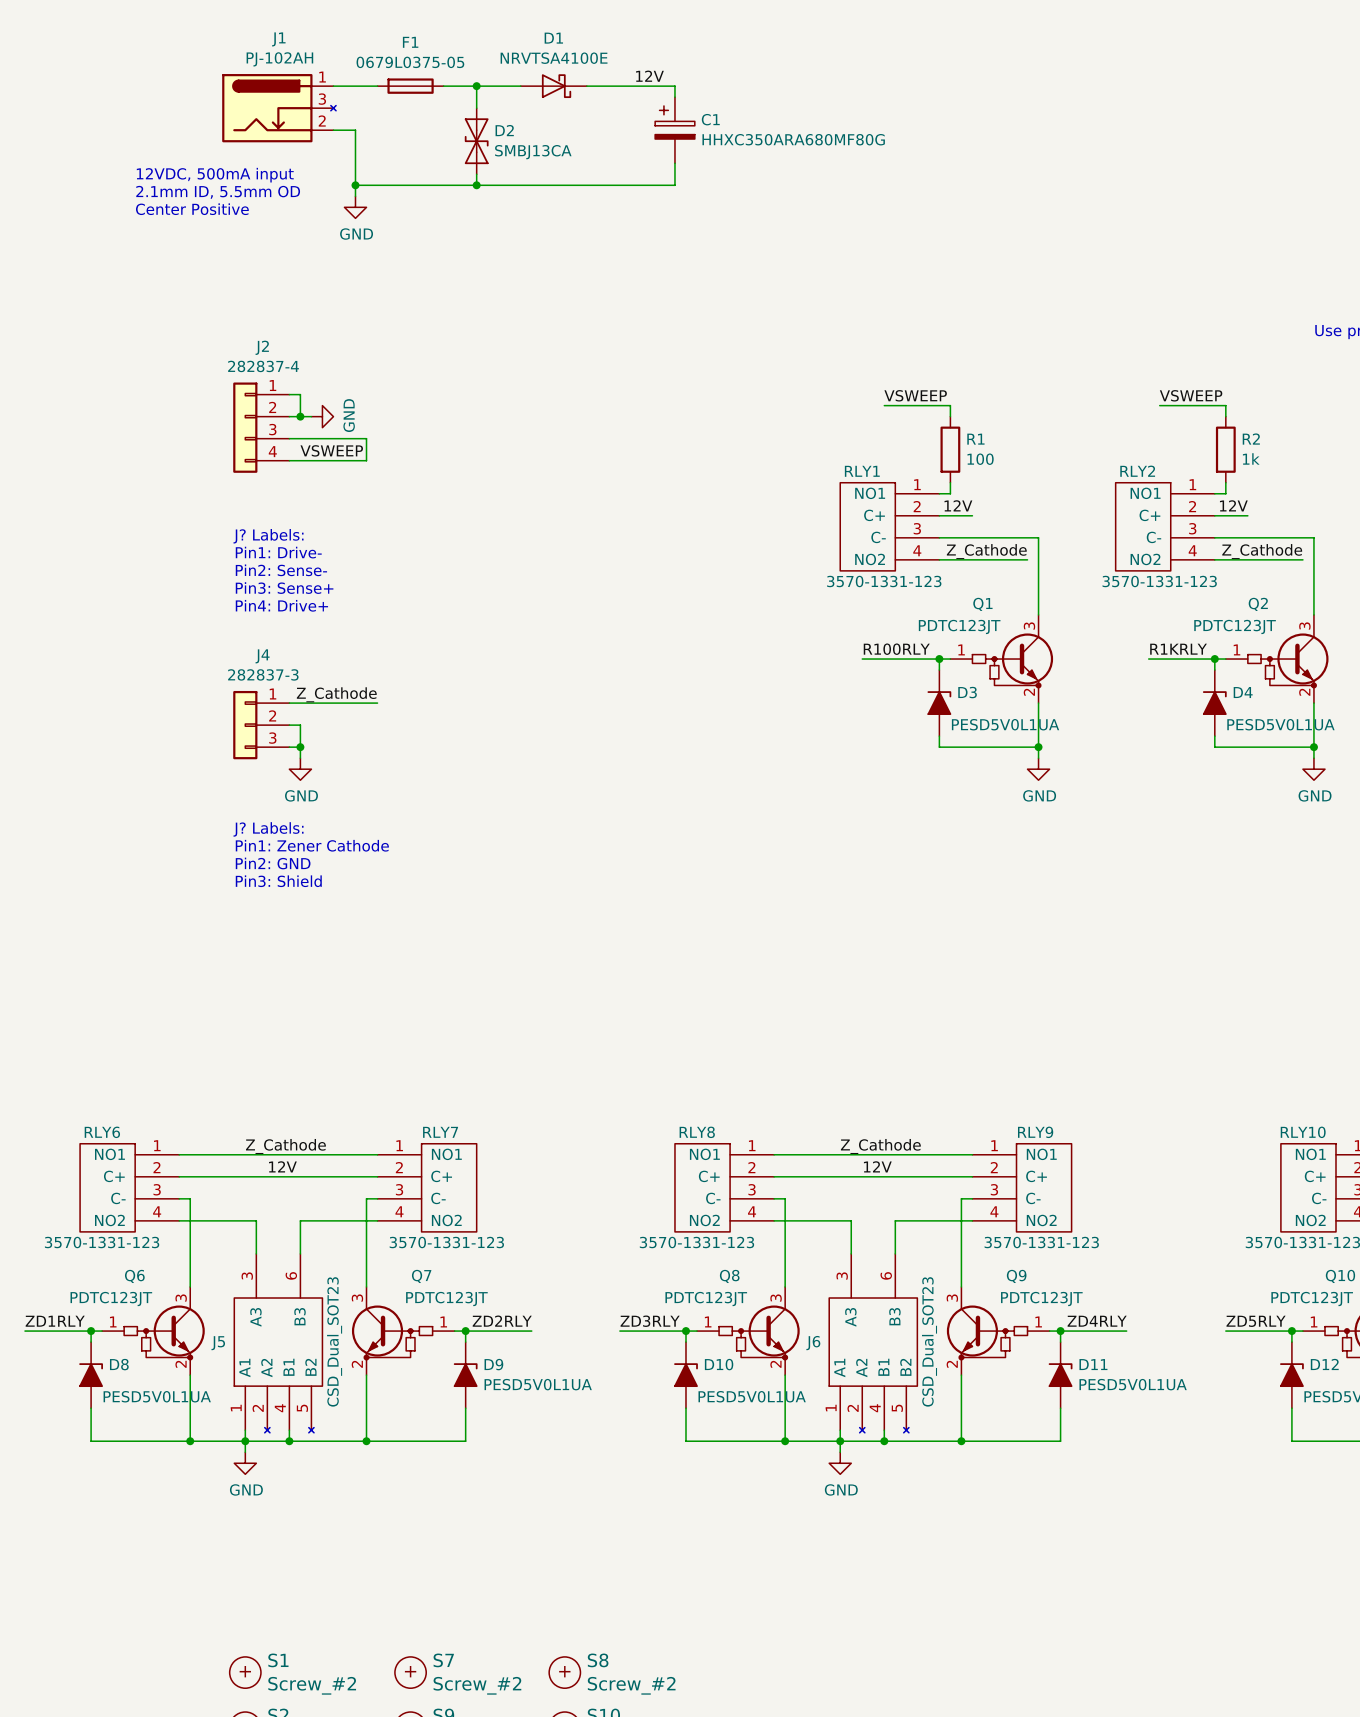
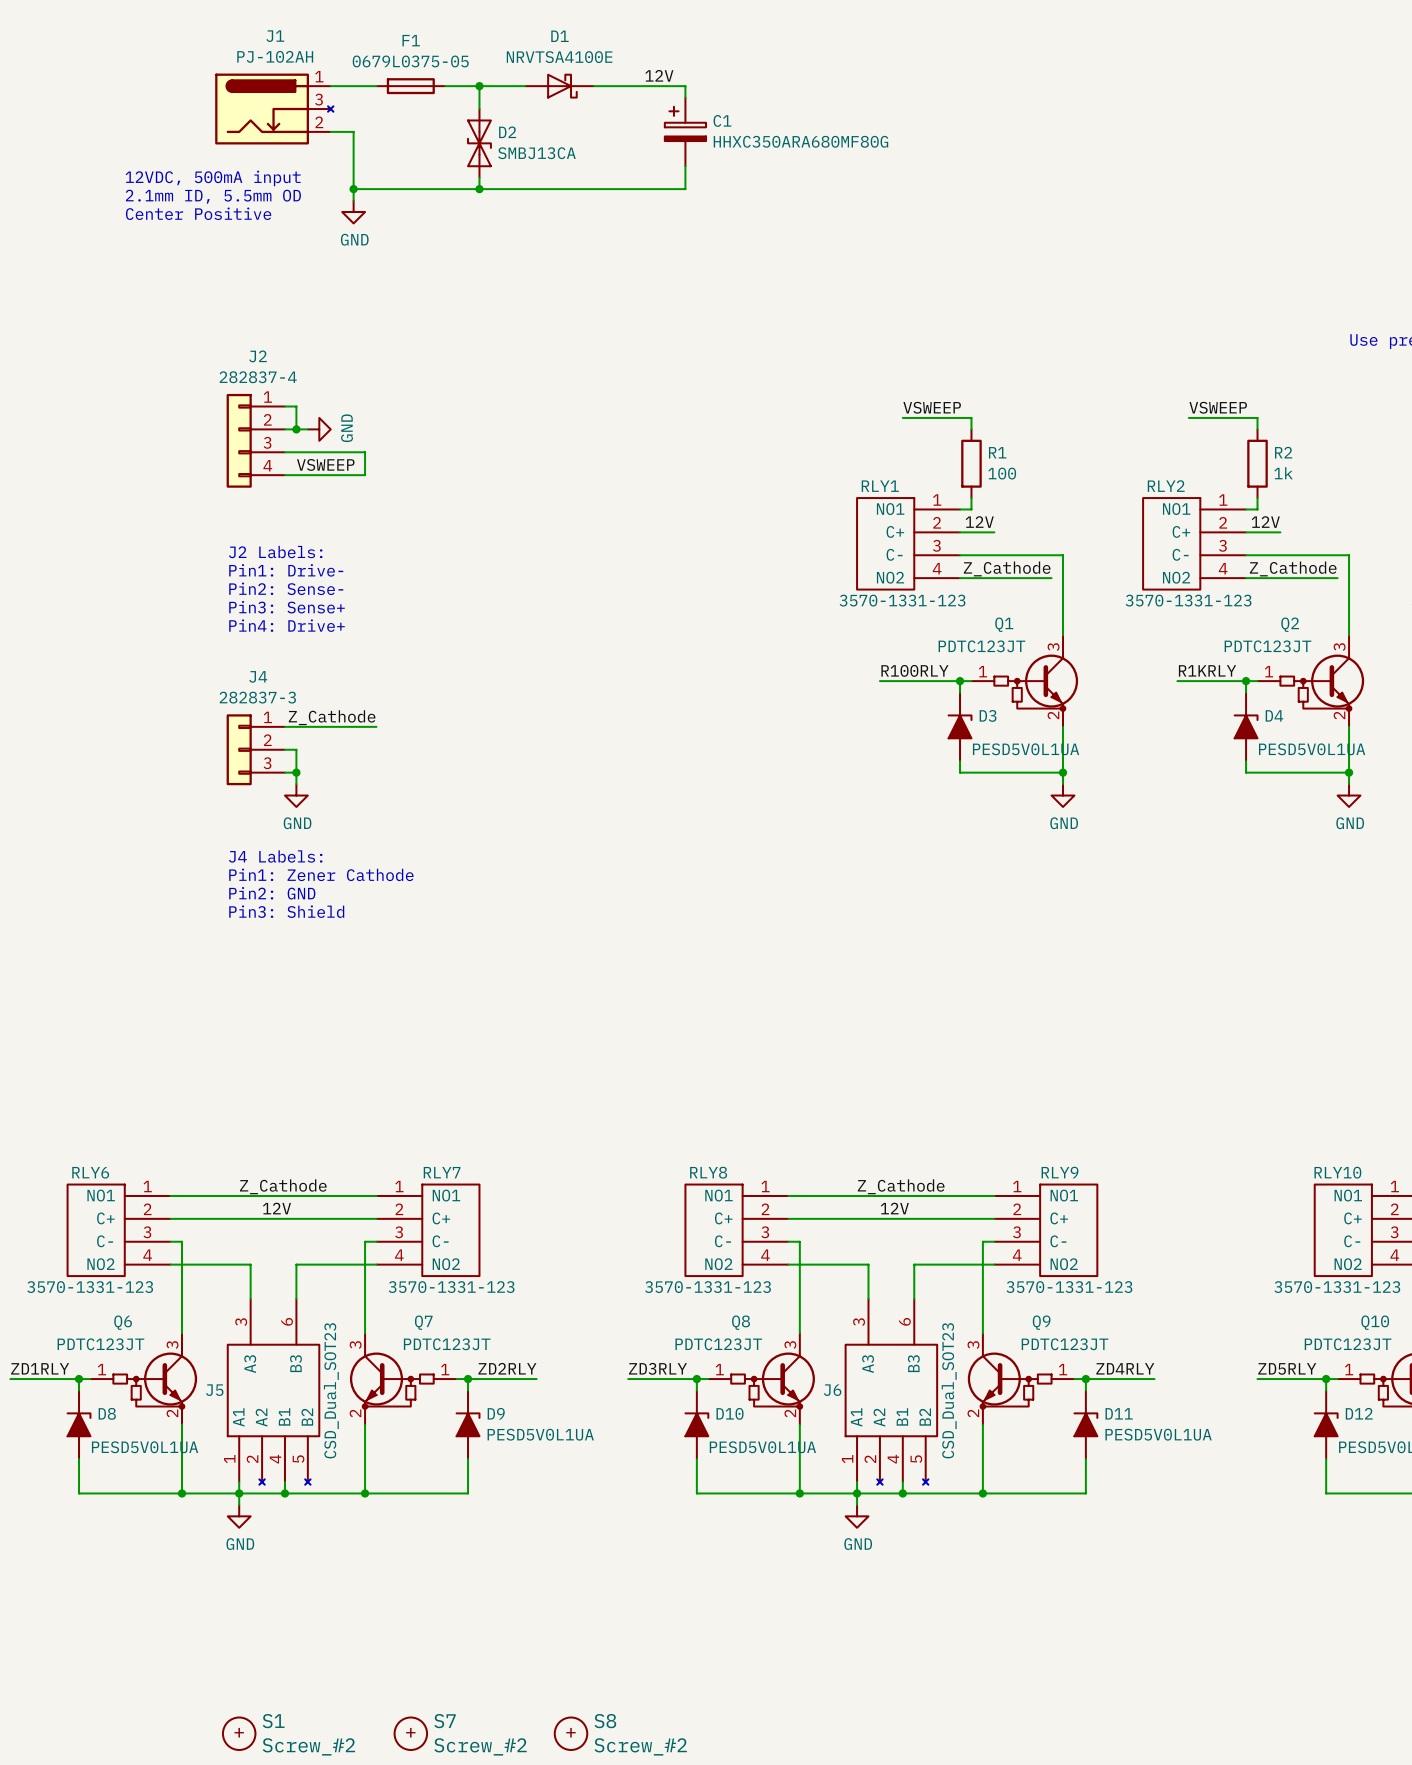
text: J? Labels: (268, 536) -> J2 Labels: (275, 552)
text: J? Labels: (268, 829) -> J4 Labels: (275, 856)

